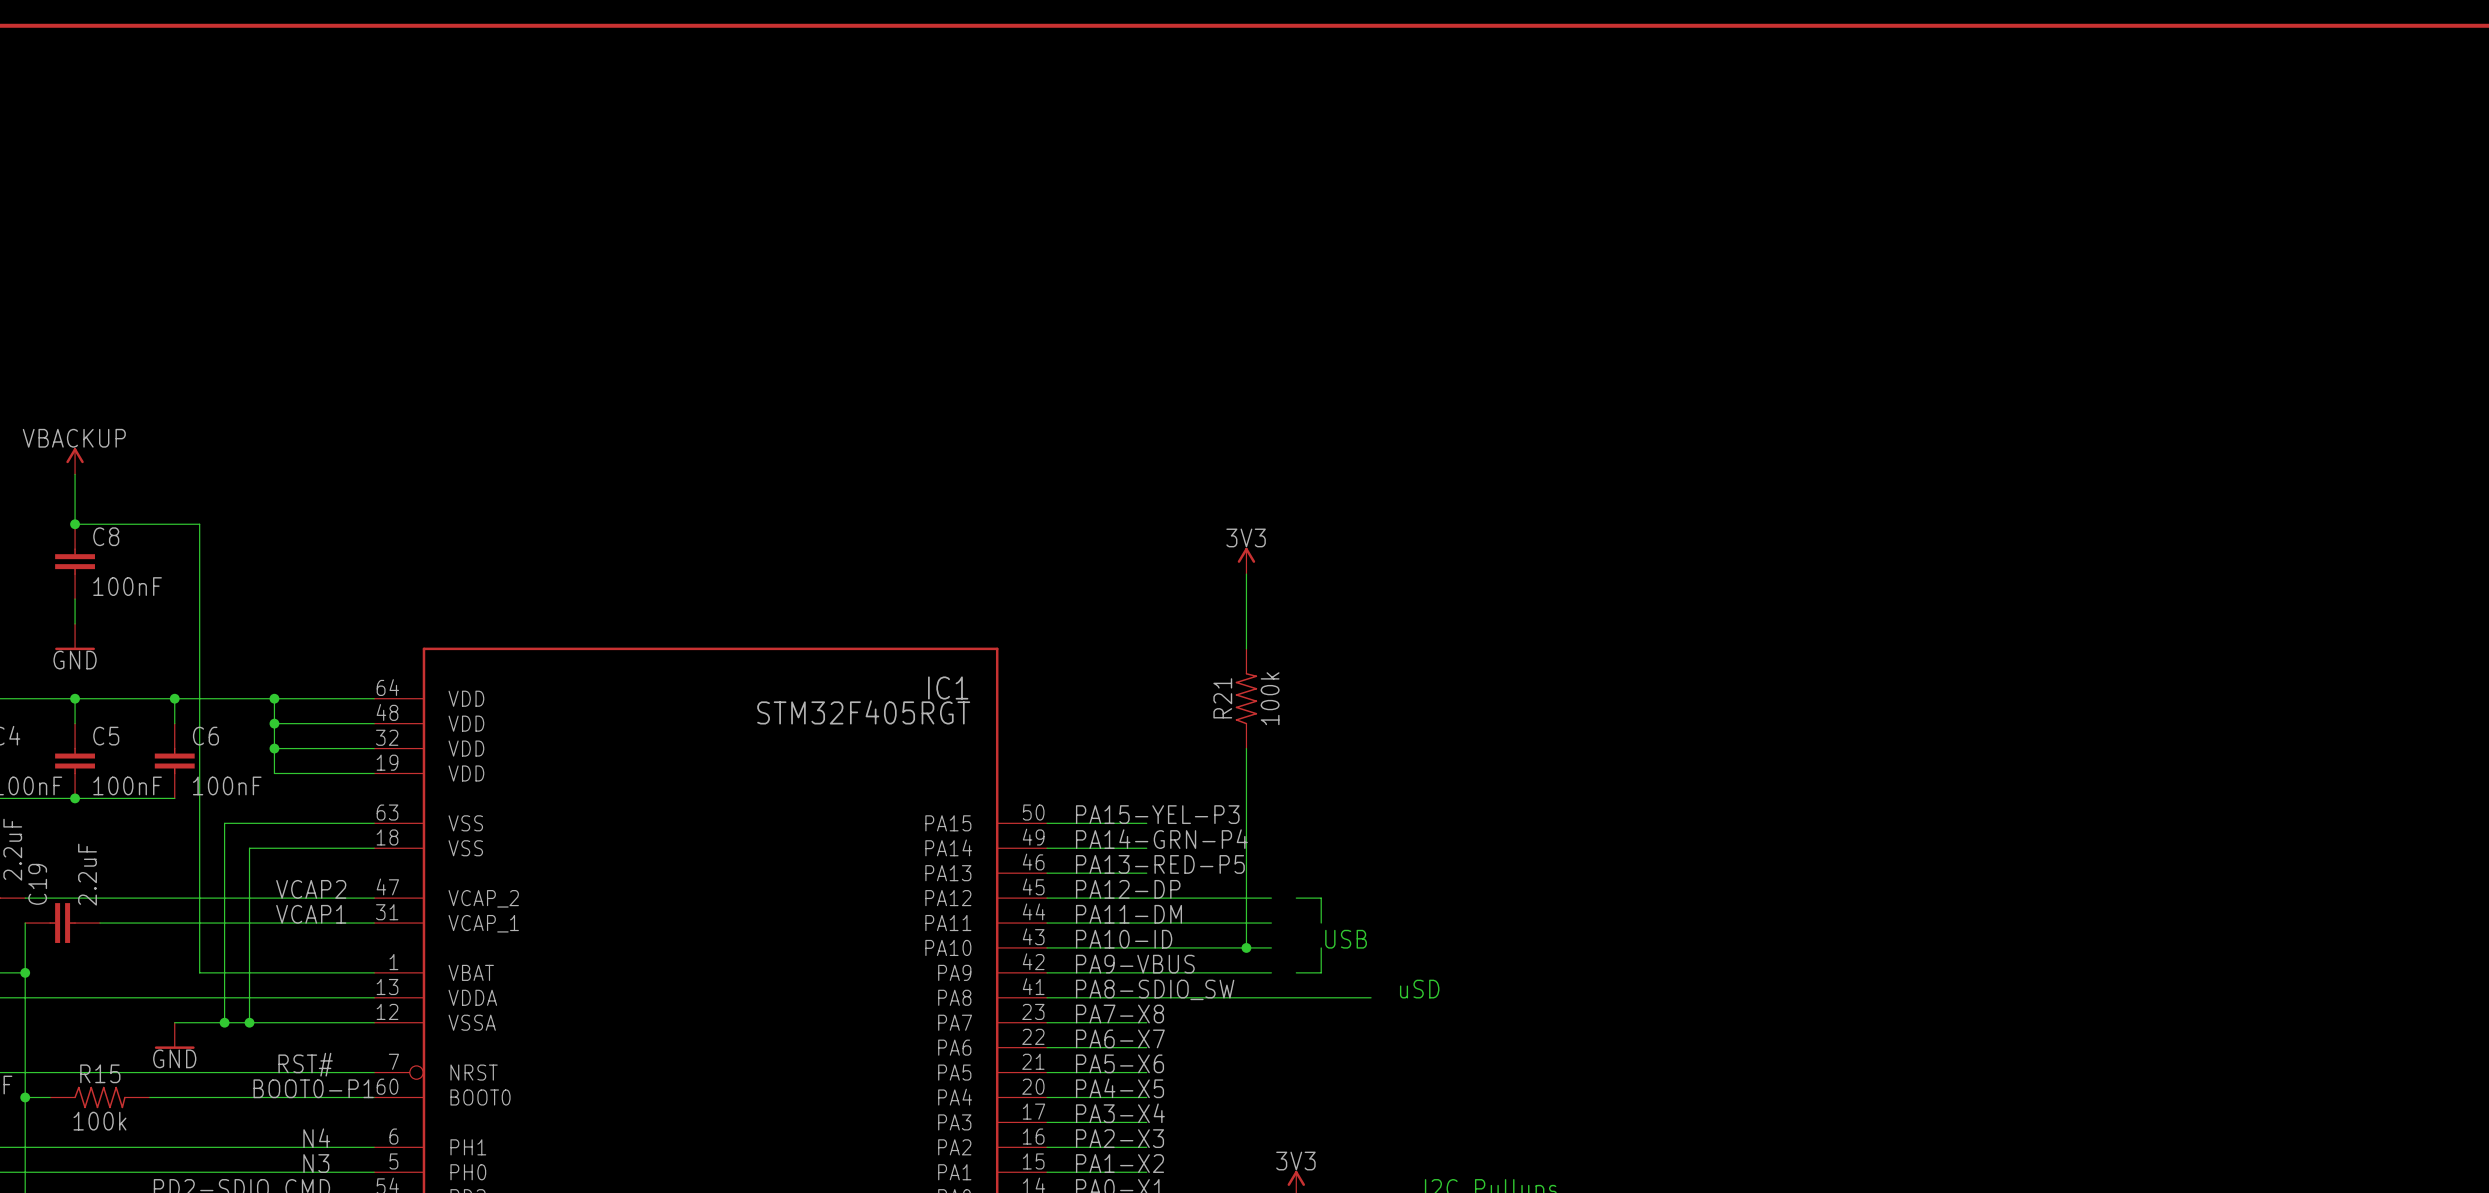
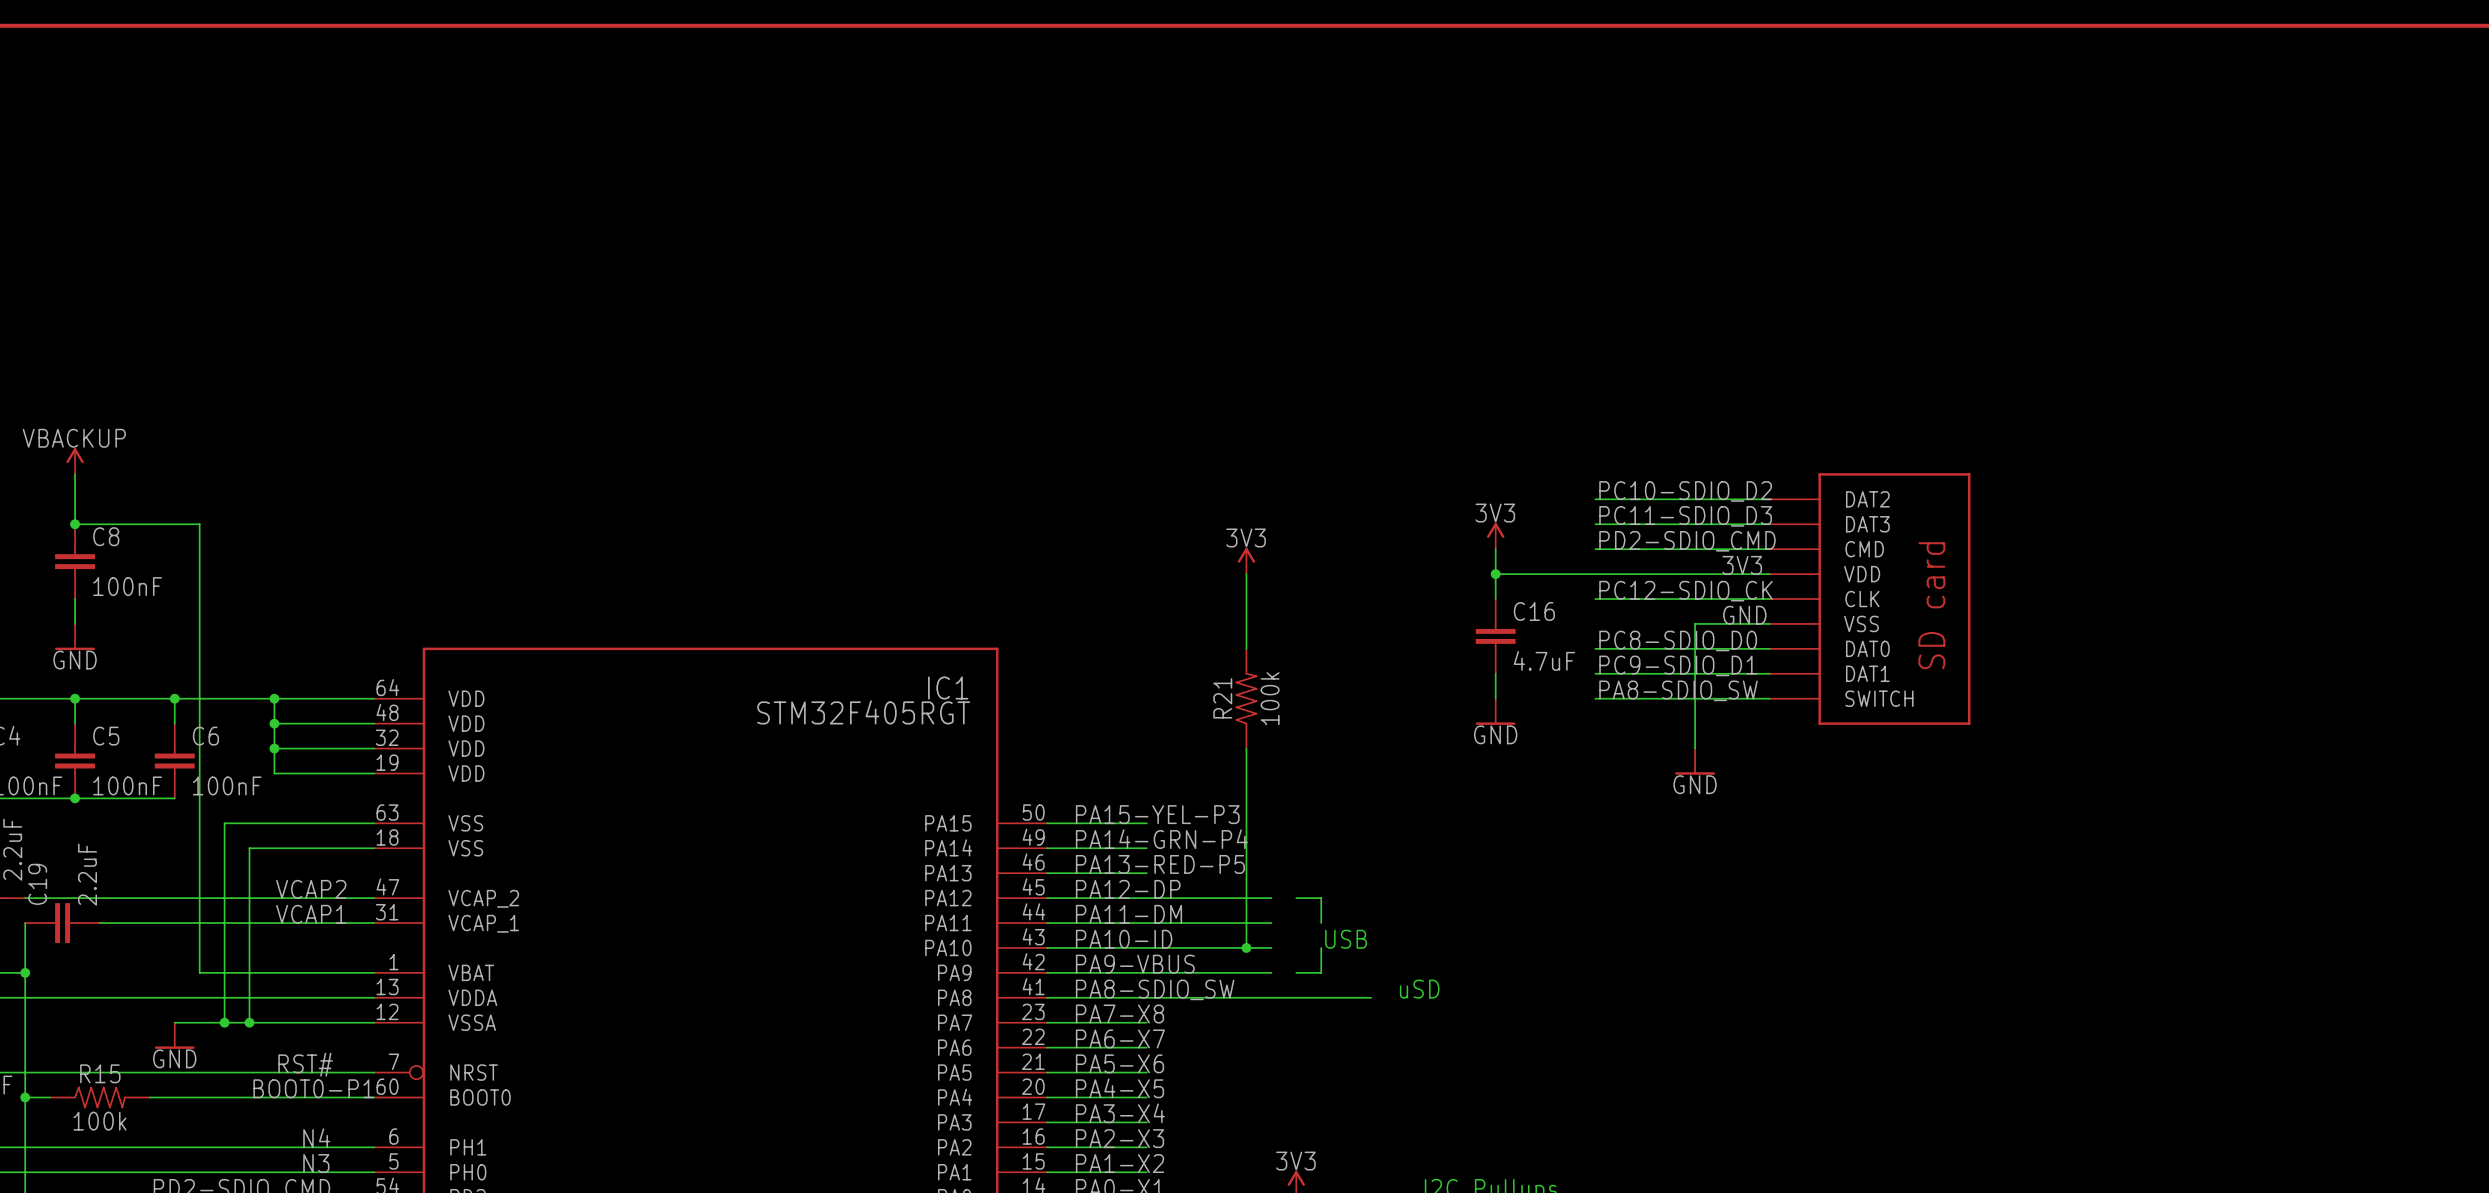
label: none -> PC10-SDIO_D2 (1685, 491)
wire: none -> (1595, 499) (1769, 499)
label: none -> PC11-SDIO_D3 (1685, 516)
wire: none -> (1595, 524) (1769, 524)
power symbol: none -> 3V3 (1495, 536)
label: none -> PD2-SDIO_CMD (1687, 541)
wire: none -> (1495, 549) (1495, 599)
wire: none -> (1595, 549) (1769, 549)
label: none -> 3V3 (1742, 565)
wire: none -> (1495, 574) (1769, 574)
junction: none -> (1495, 574)
label: none -> PC12-SDIO_CK (1686, 591)
wire: none -> (1595, 599) (1769, 599)
part: none -> (1870, 599)
label: none -> GND (1744, 615)
wire: none -> (1769, 623) (1695, 623) (1695, 748)
C16: none -> 4.7uF (1495, 636)
label: none -> PC8-SDIO_D0 (1678, 640)
wire: none -> (1595, 648) (1769, 648)
label: none -> PC9-SDIO_D1 (1678, 665)
wire: none -> (1495, 673) (1495, 698)
wire: none -> (1595, 673) (1769, 673)
label: none -> PA8-SDIO_SW (1678, 690)
wire: none -> (1595, 698) (1769, 698)
power symbol: none -> GND (1495, 711)
power symbol: none -> GND (1695, 761)

